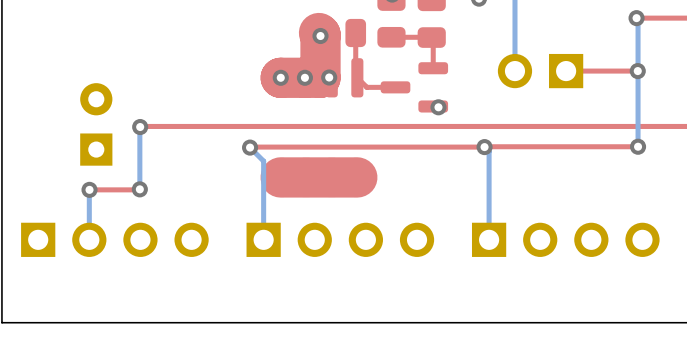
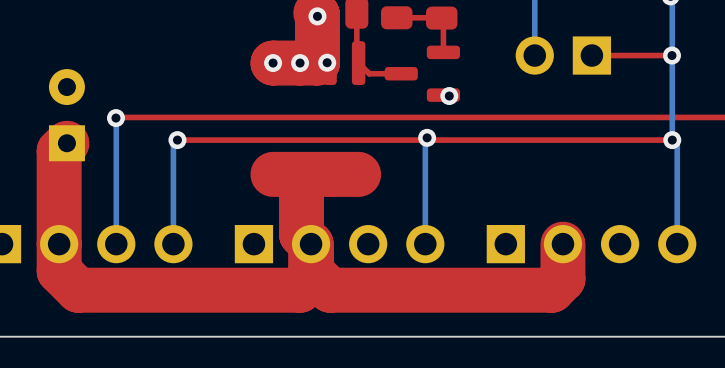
bottom track: (139, 127) (139, 189) -> (116, 118) (116, 244)
bottom track: none -> (427, 137) (425, 139) (425, 244)
bottom track: none -> (177, 140) (173, 144) (173, 244)
via: none -> (177, 140)
top track: (484, 146) (250, 147) -> (501, 140) (177, 140)
bottom track: none -> (672, 140) (677, 145) (677, 244)
bottom track: (250, 147) (263, 161) (263, 239) -> none
via: (250, 147) -> none
bottom track: (484, 147) (489, 151) (489, 239) -> none
via position: (484, 147) -> (427, 137)
top track: none -> (66, 143) (59, 151) (59, 271) (78, 290) (300, 290) (311, 279) (311, 244) (301, 234) (301, 174)
via: (89, 189) -> none
top track: (139, 189) (89, 189) -> none
via: (139, 189) -> none
bottom track: (89, 190) (89, 239) -> none
top track: none -> (562, 244) (562, 279) (551, 290) (330, 290) (311, 271)

